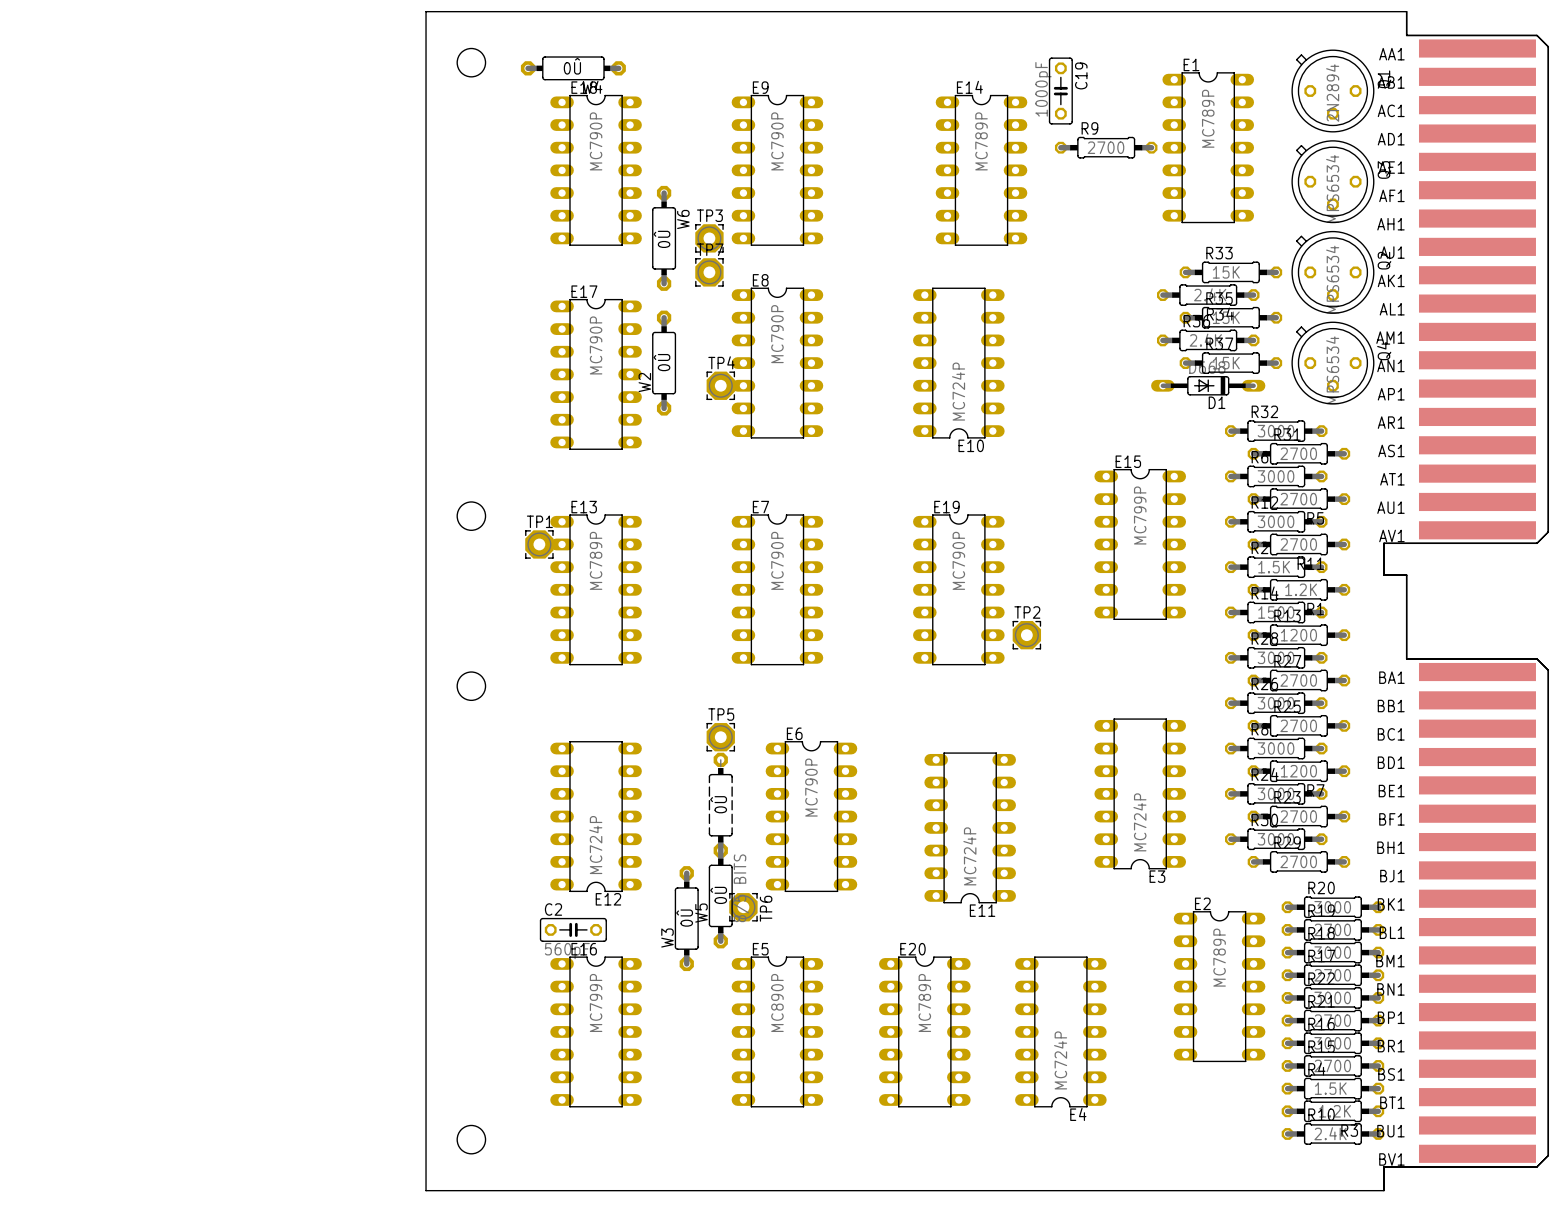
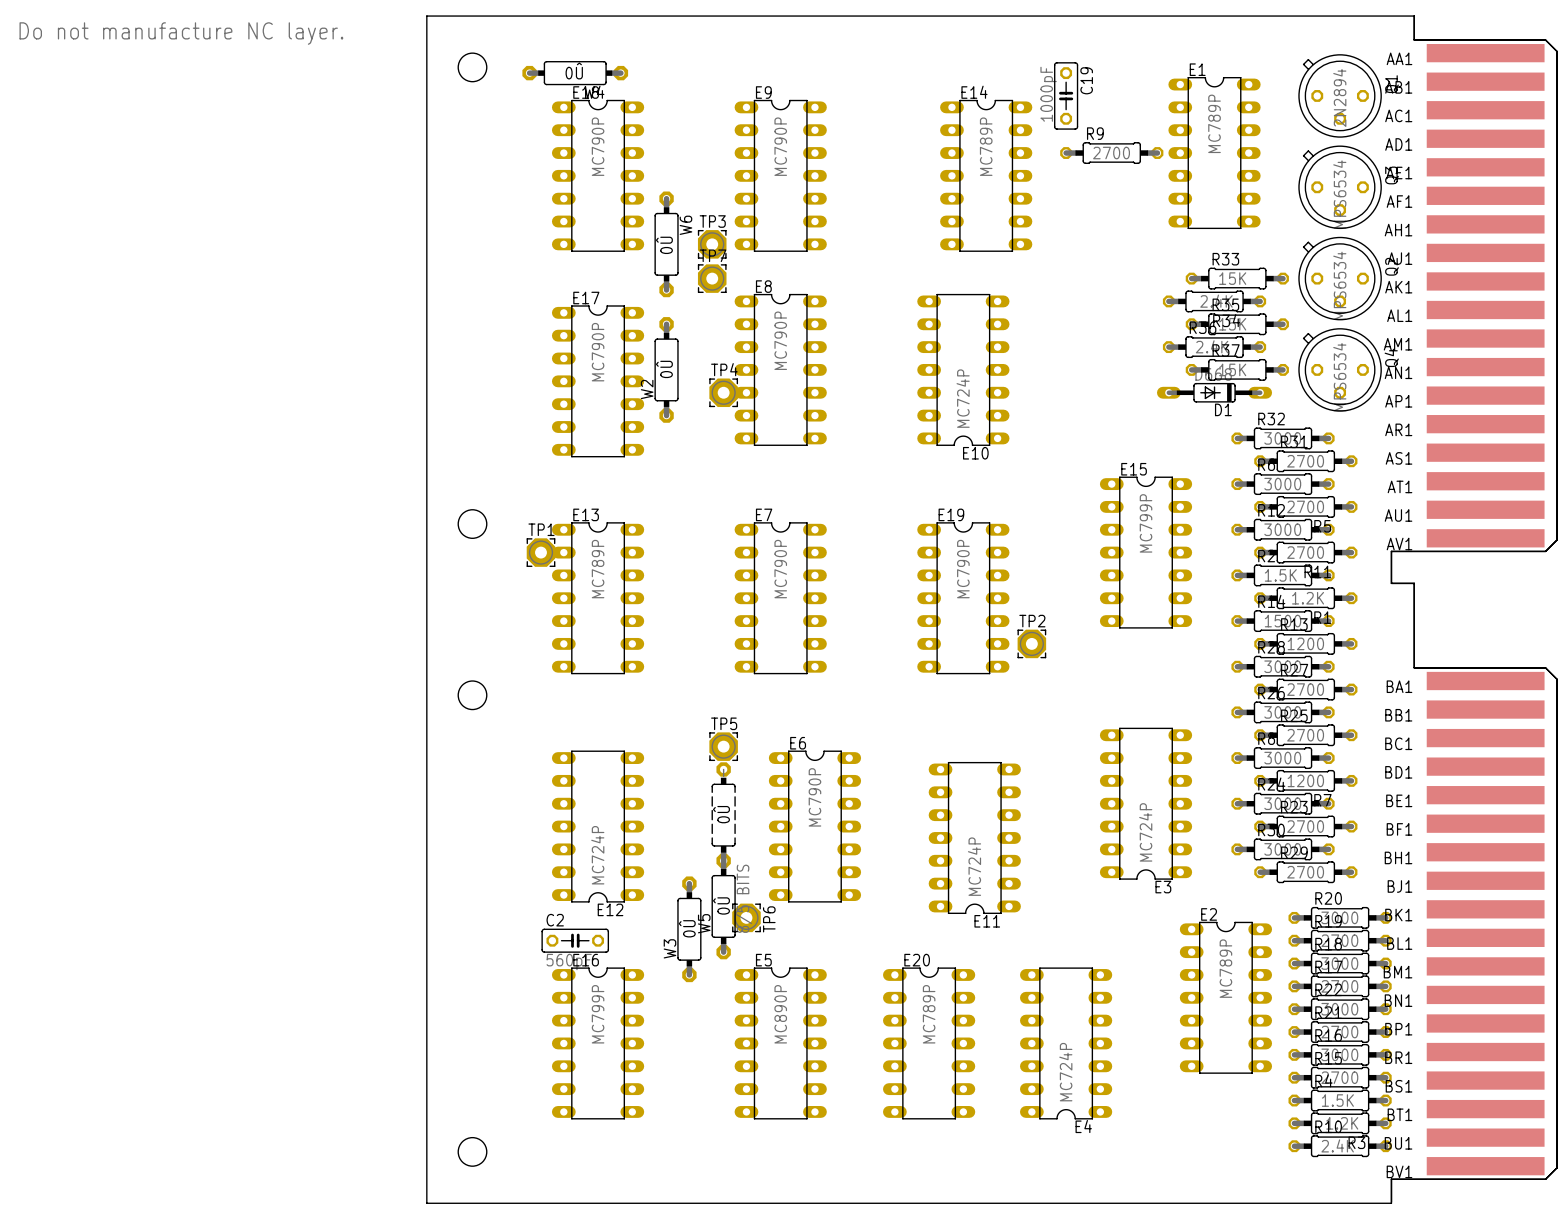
text: none -> Do not manufacture NC layer. (181, 33)

